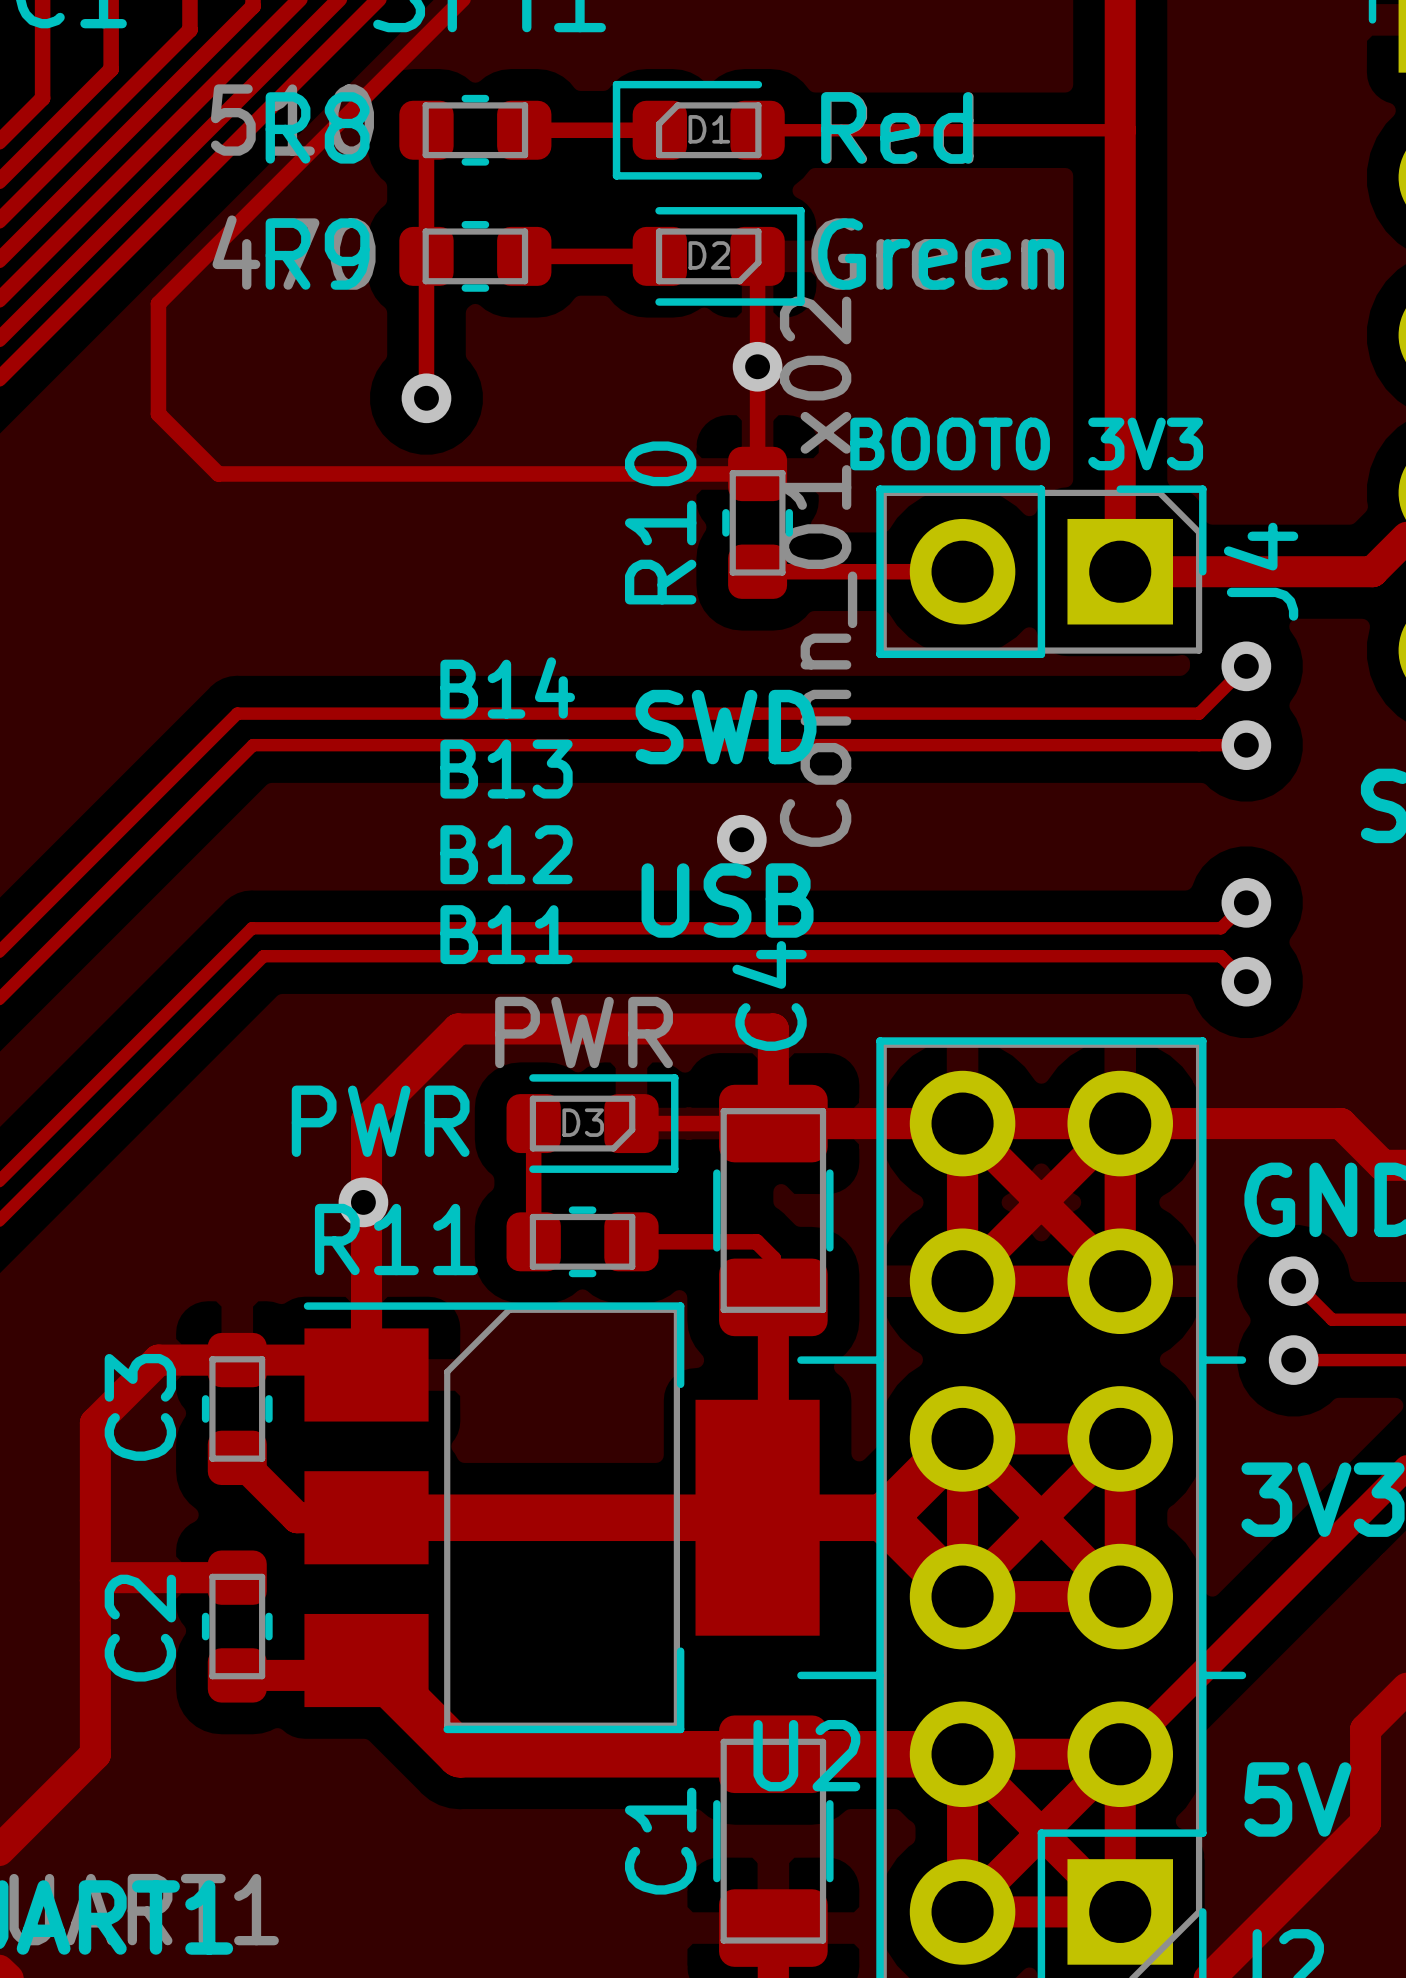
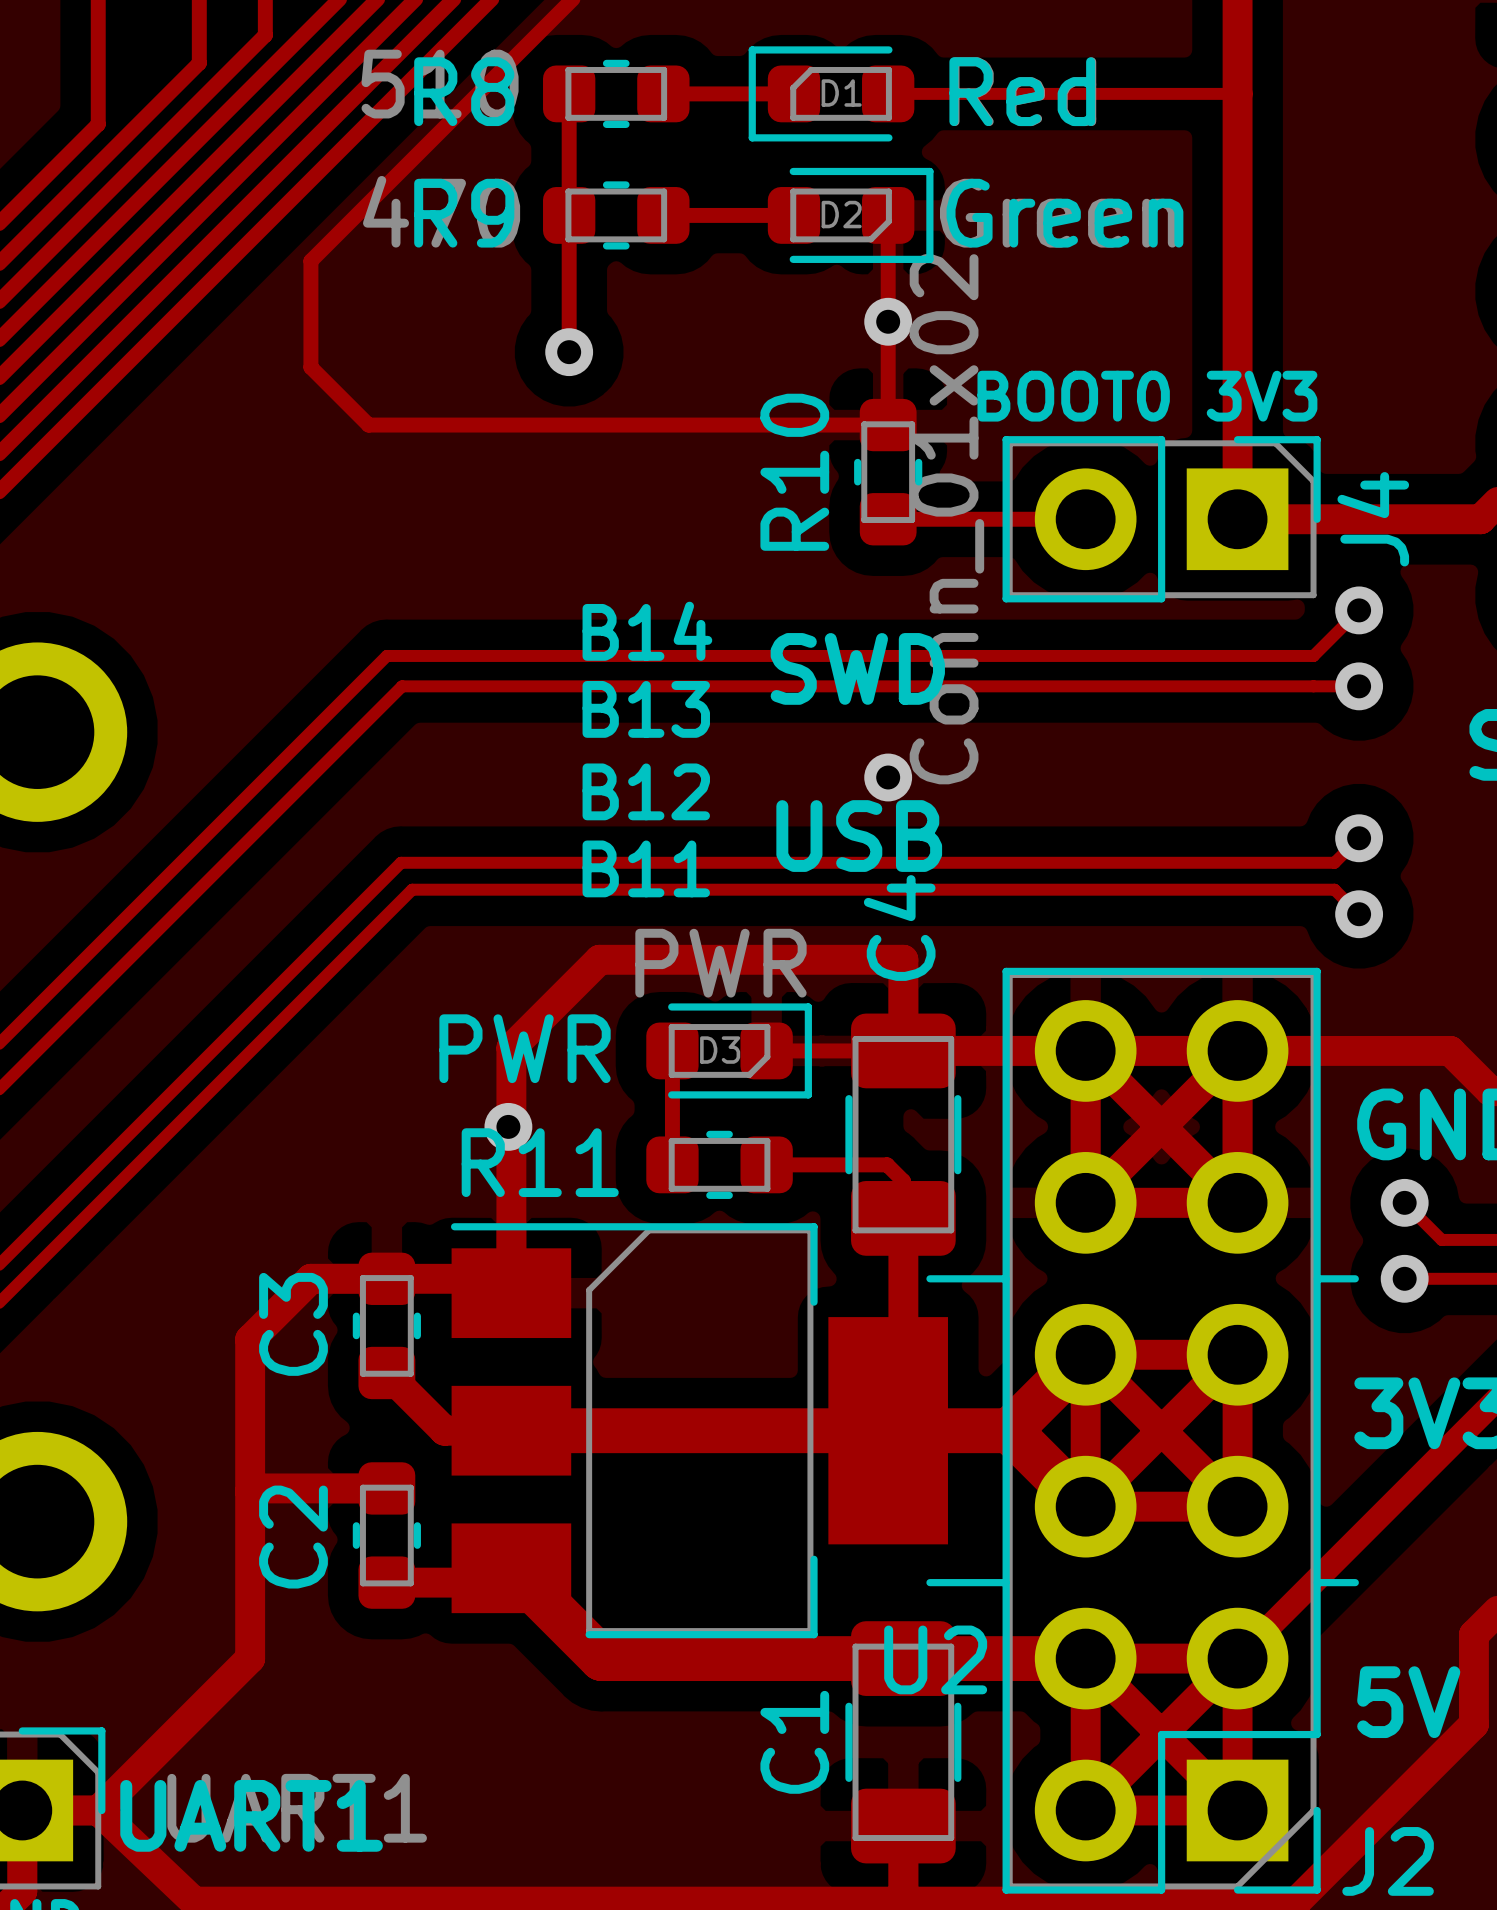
via position: (741, 839) -> (888, 777)

